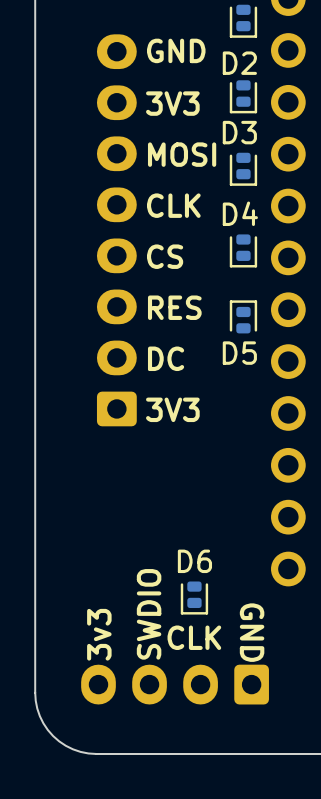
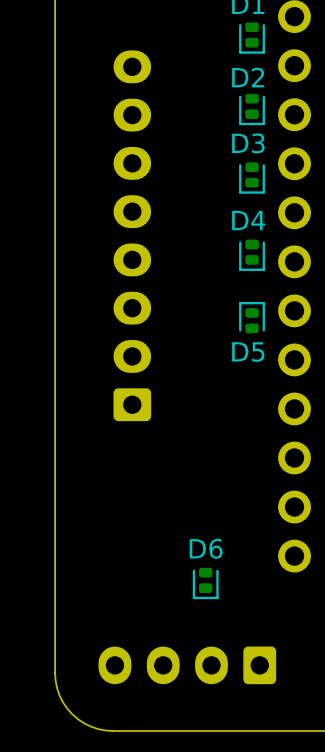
text: GND (176, 50) -> none
text: 3V3 (172, 103) -> none
text: MOSI (182, 154) -> none
text: CLK (173, 205) -> none
text: CS (165, 256) -> none
text: RES (174, 307) -> none
text: DC (166, 358) -> none
text: 3V3 (172, 409) -> none
text: SWDIO (149, 614) -> none
text: GND (252, 632) -> none
text: 3v3 (99, 634) -> none
text: CLK (194, 637) -> none

